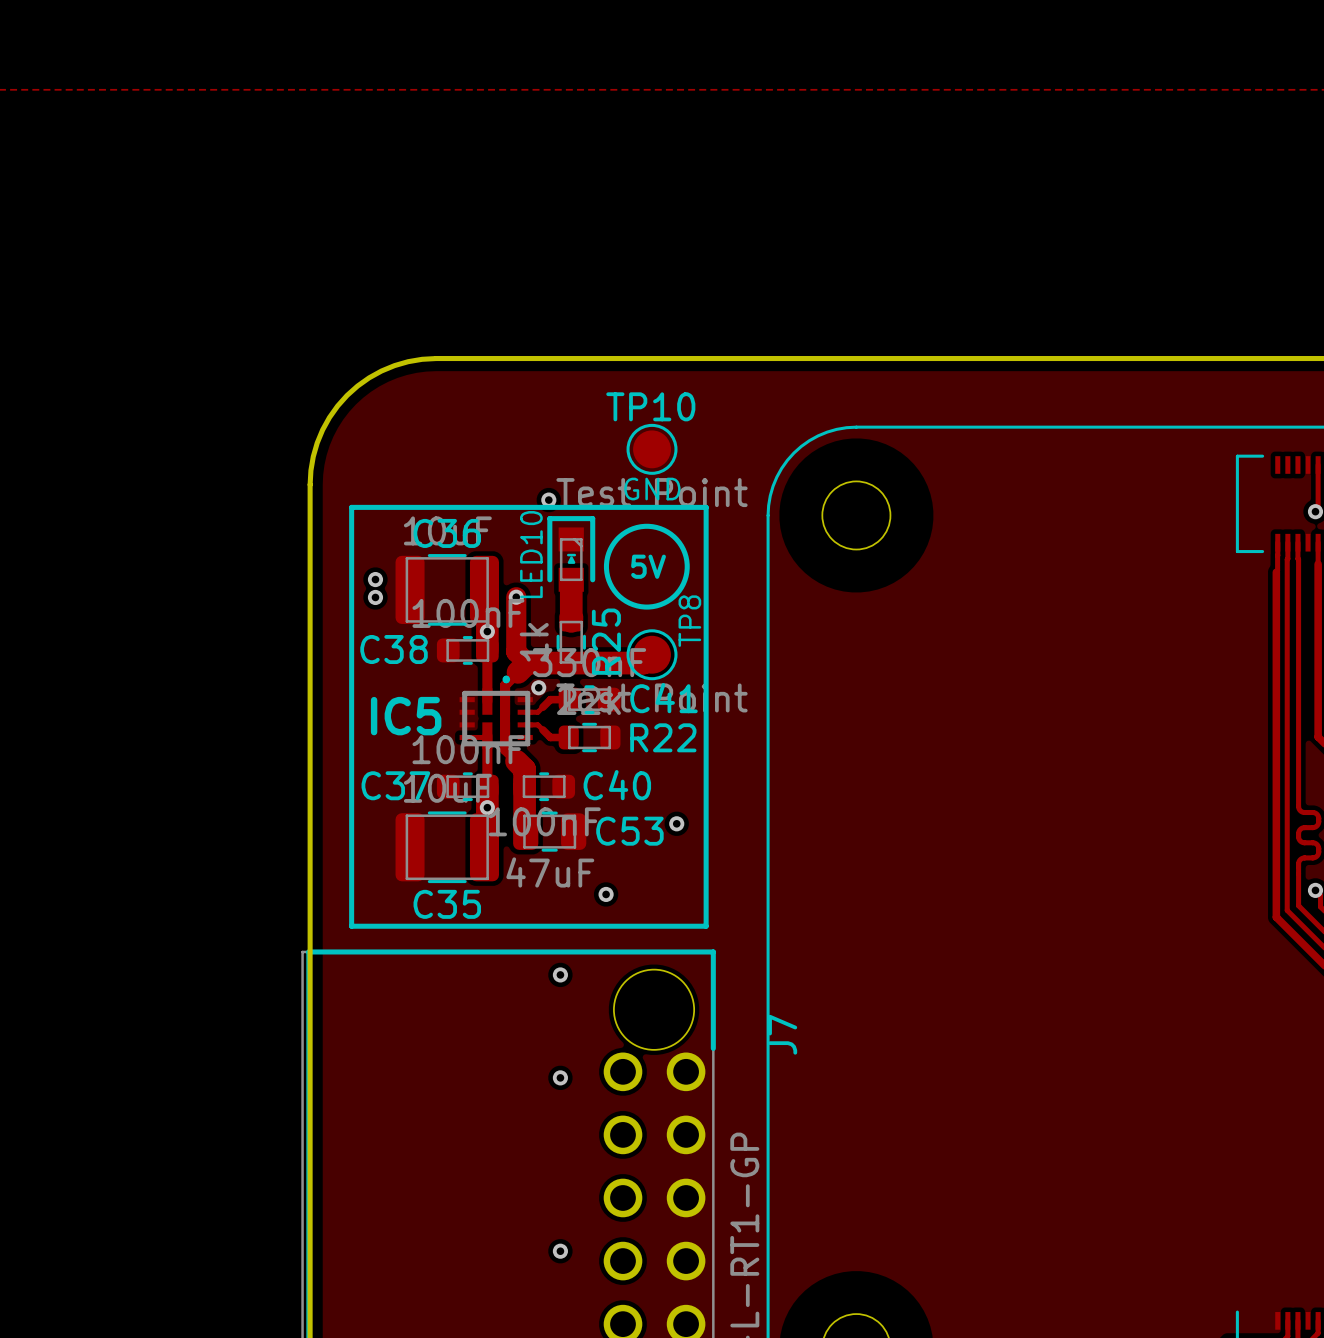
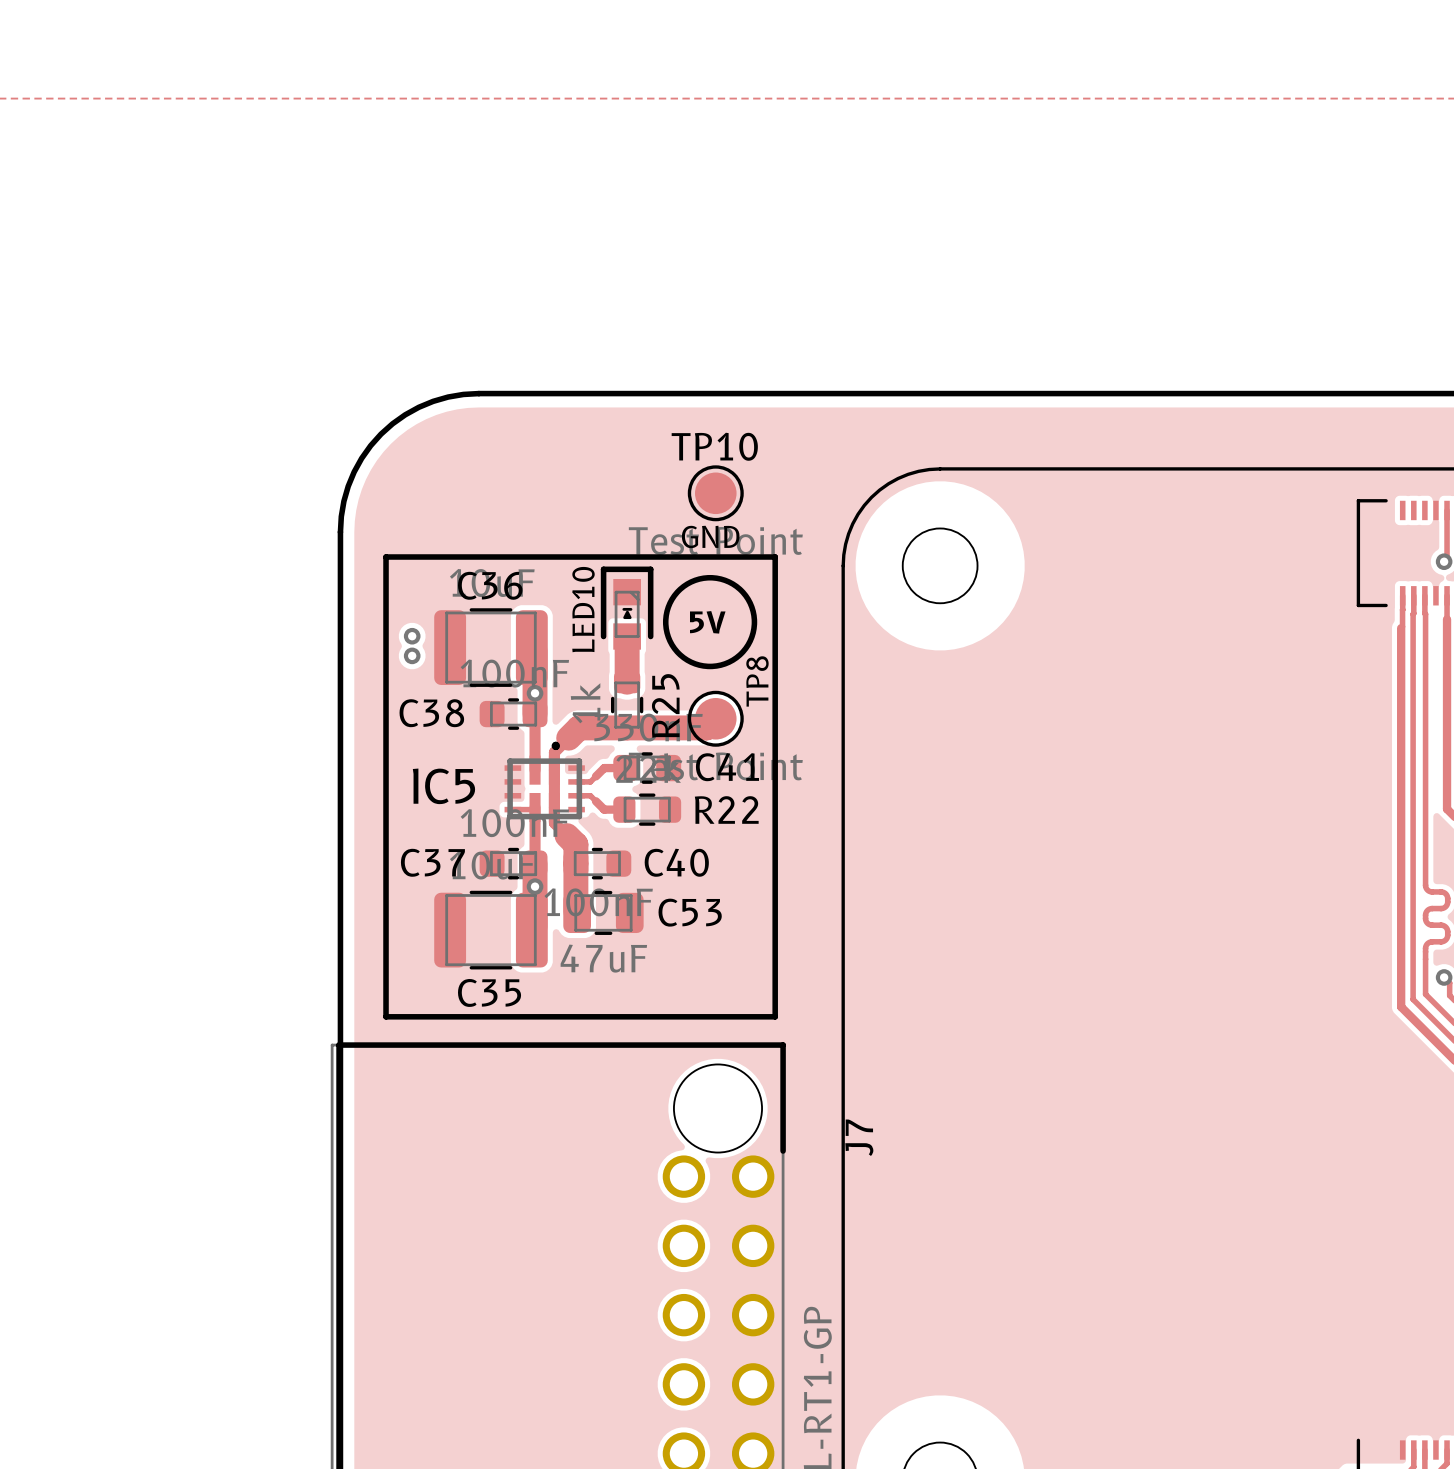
via: (548, 500) -> none
track: (516, 597) (516, 651) (527, 663) -> none
via: (516, 597) -> none
via: (538, 687) -> none
via: (676, 823) -> none
via: (606, 894) -> none
via: (560, 974) -> none
via: (560, 1077) -> none
via: (560, 1251) -> none

